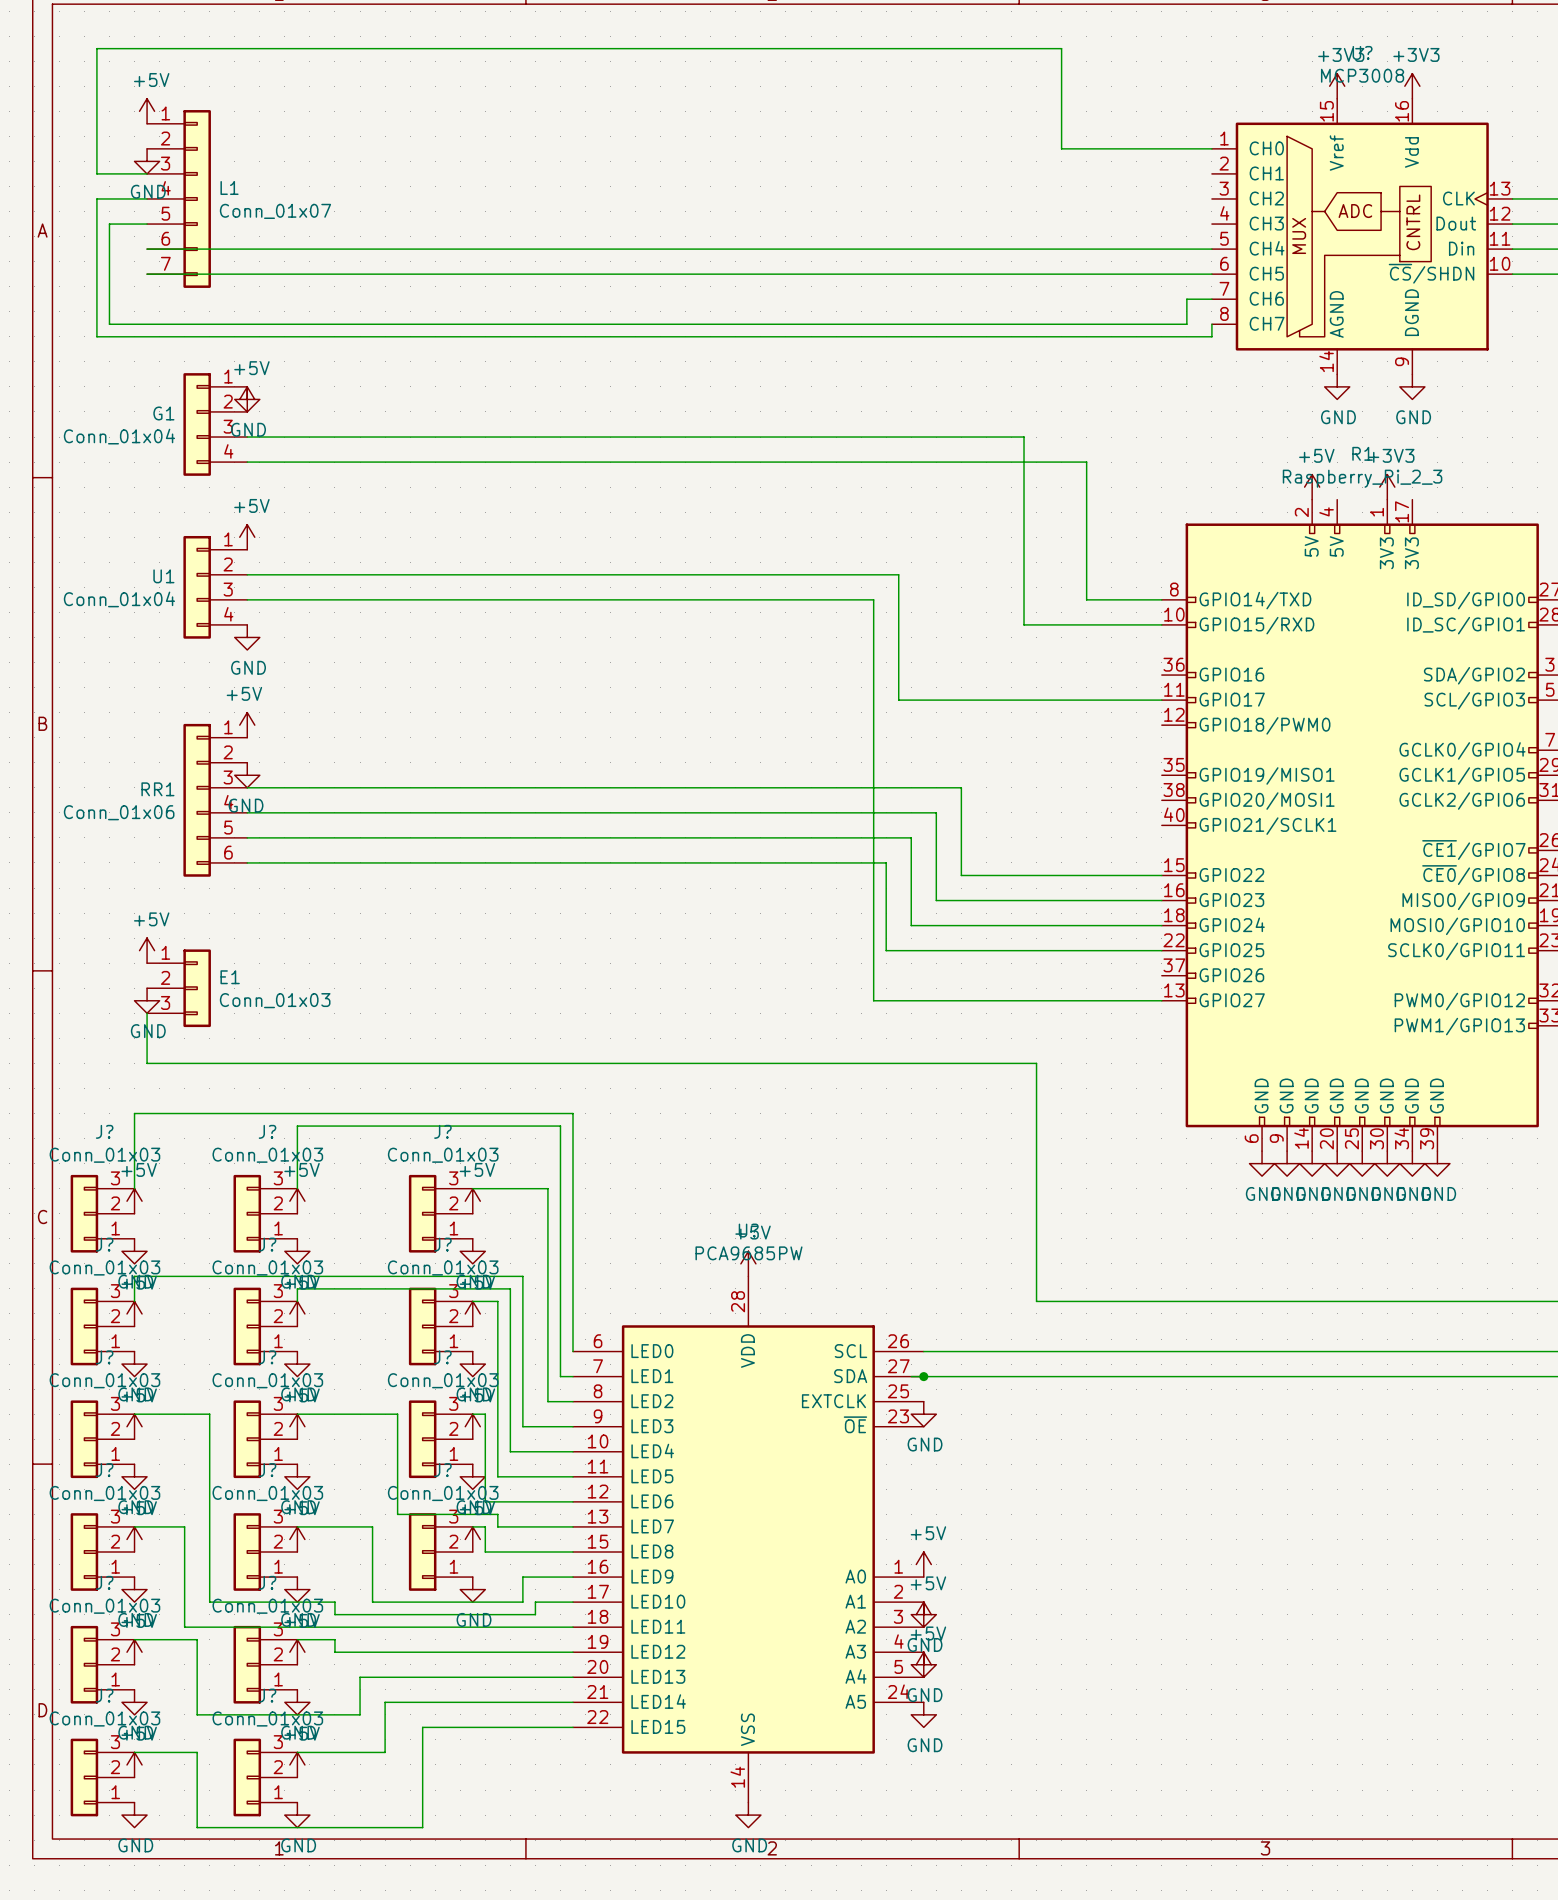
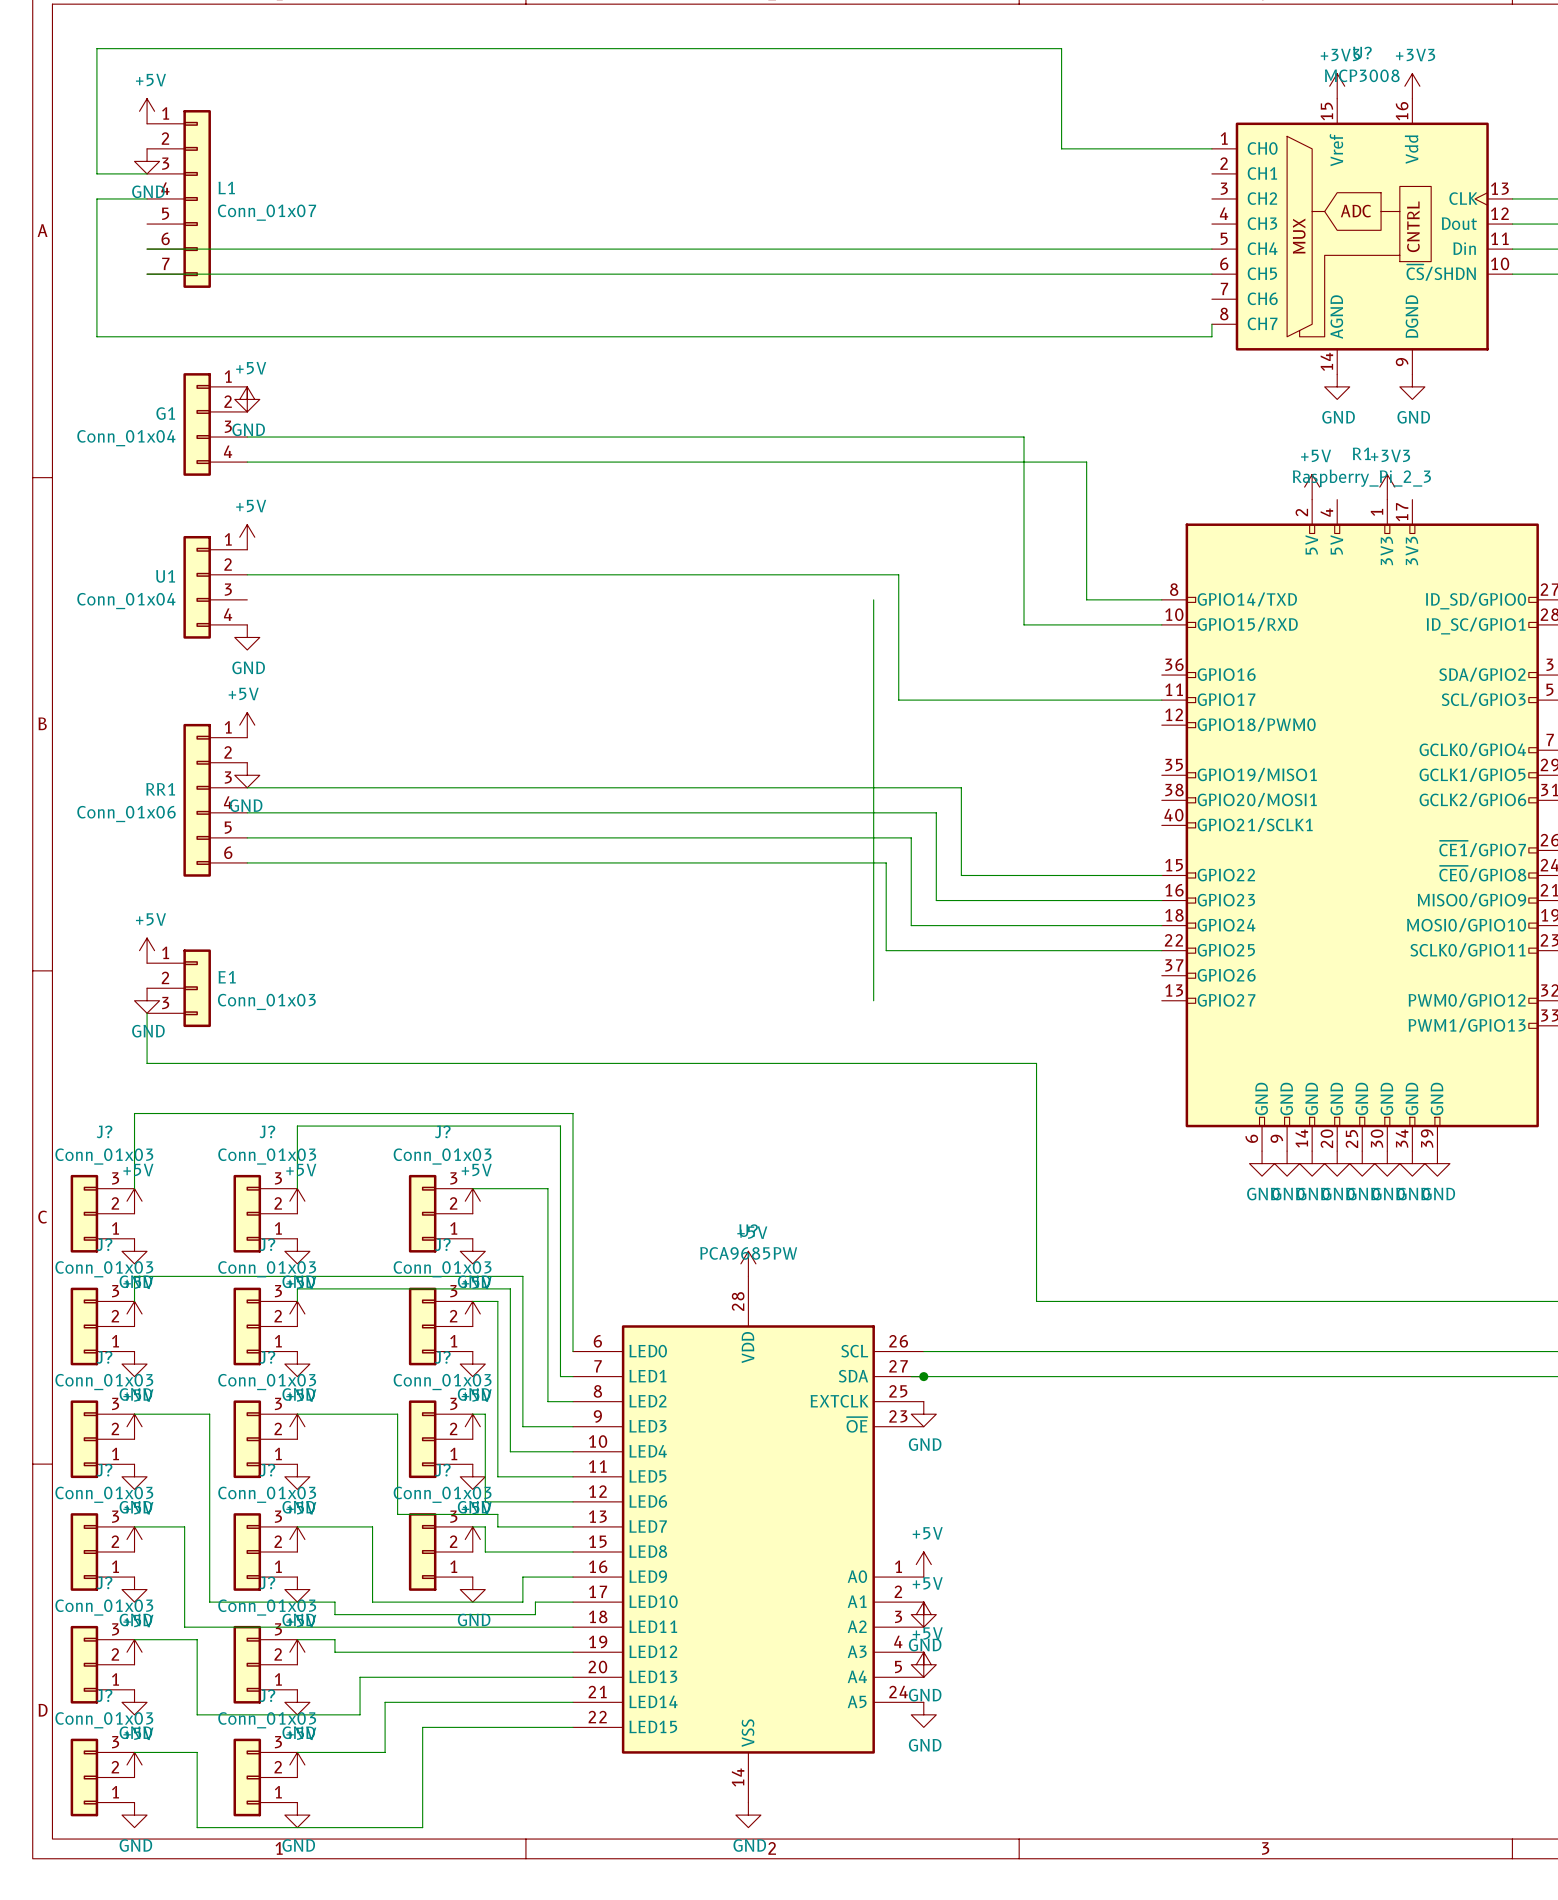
wire: (147, 224) (109, 224) (109, 324) (1186, 324) (1186, 299) (1211, 299) -> none
wire: (247, 599) (873, 599) -> none
wire: (873, 1000) (1161, 1000) -> none

